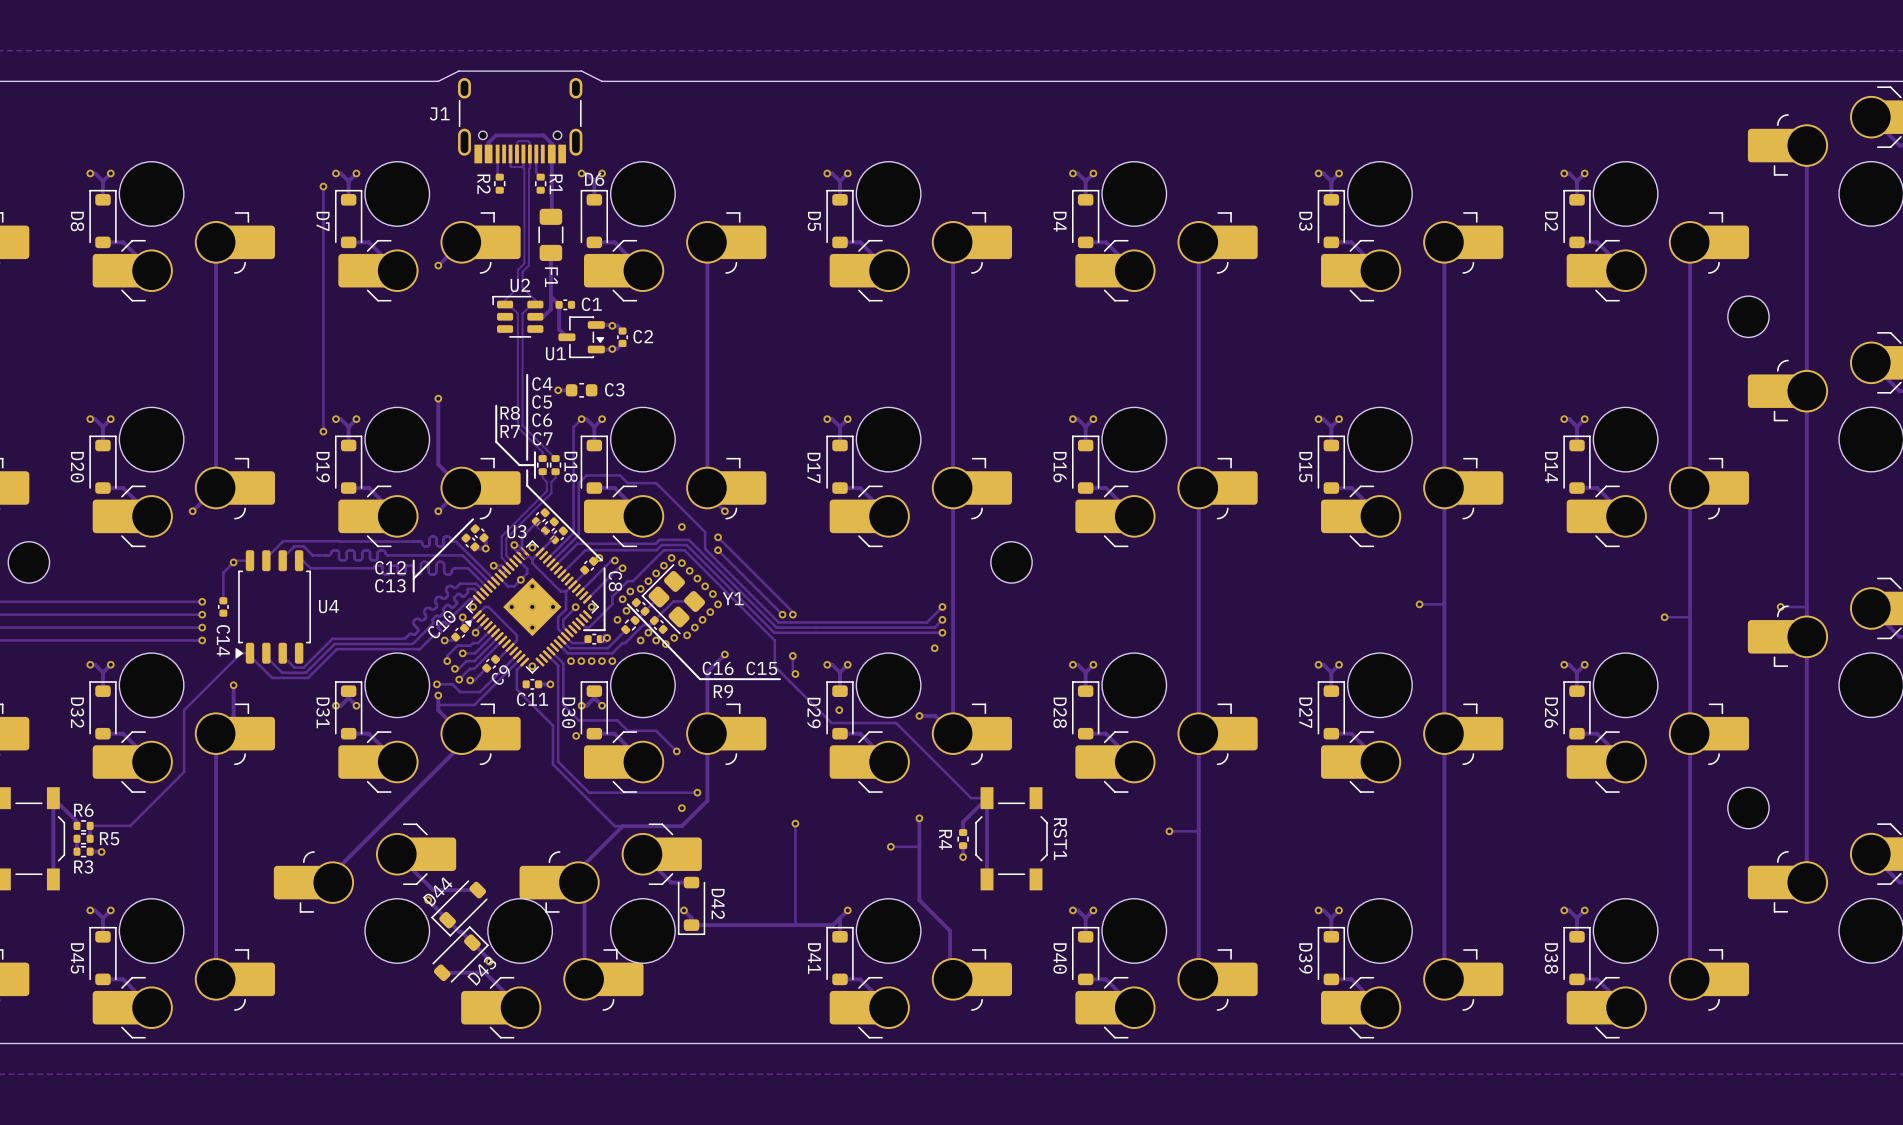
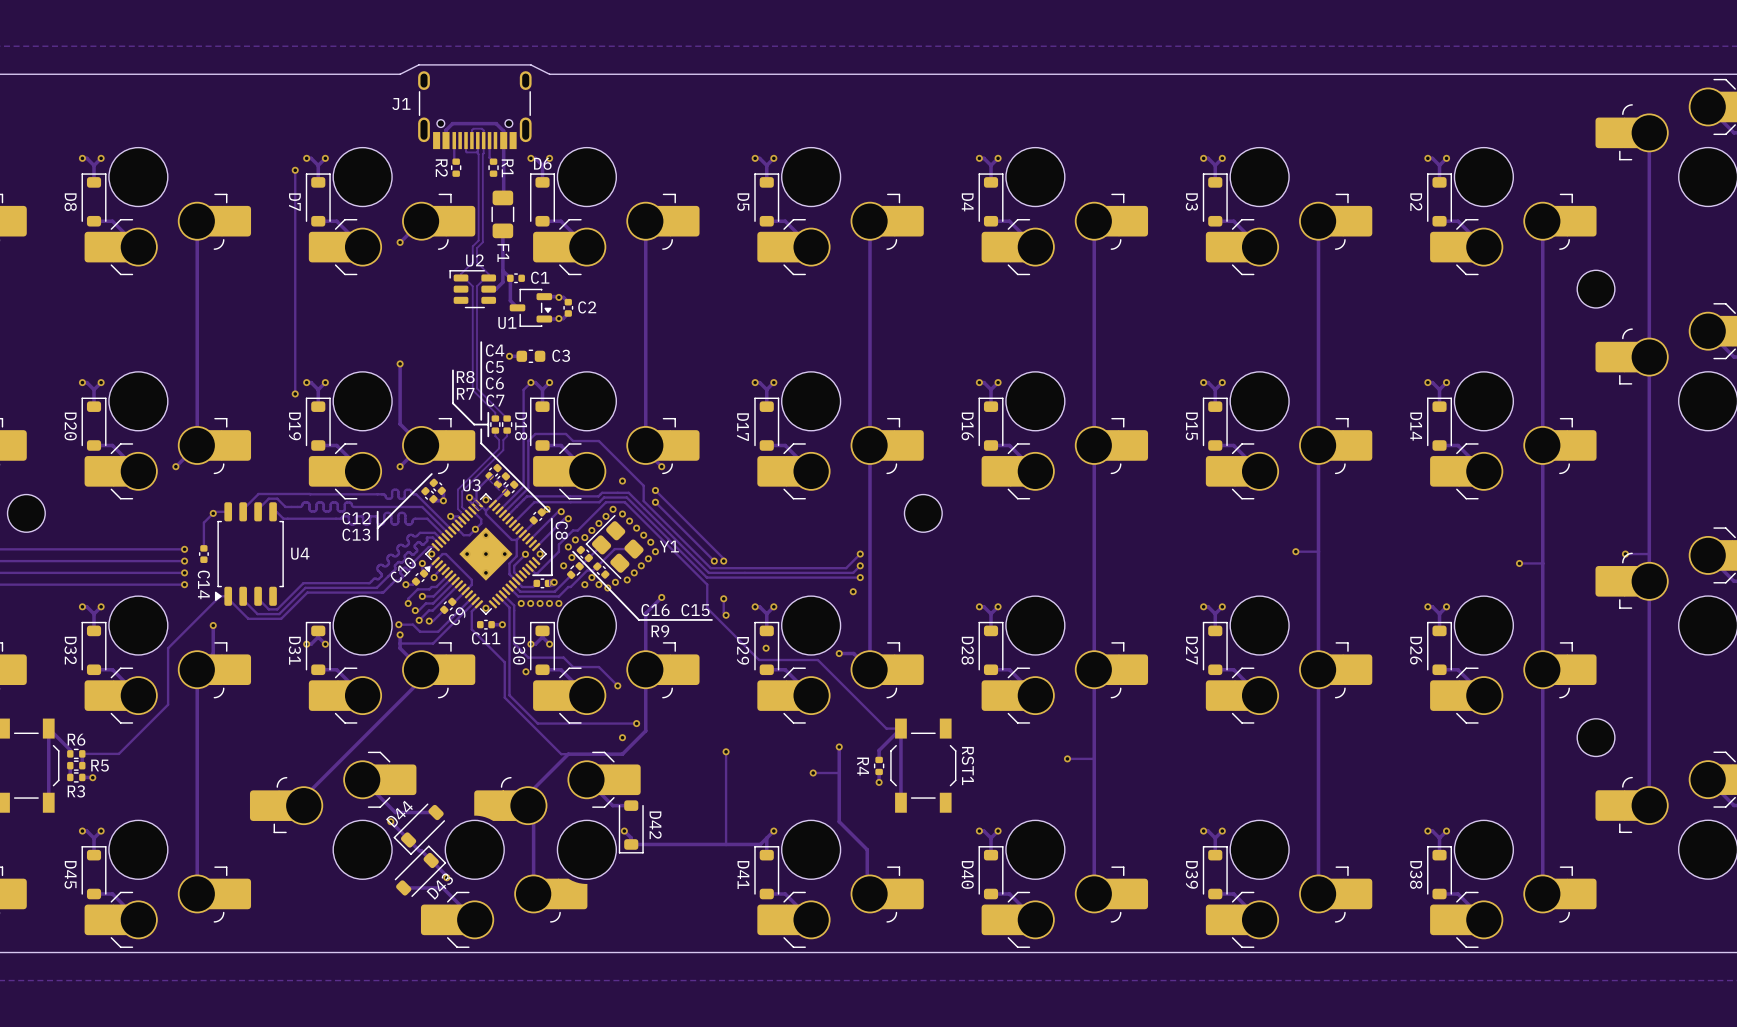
part footprint: [519, 823, 702, 964] -> [474, 751, 641, 880]
part footprint: [461, 898, 644, 1039] -> [420, 820, 588, 948]

